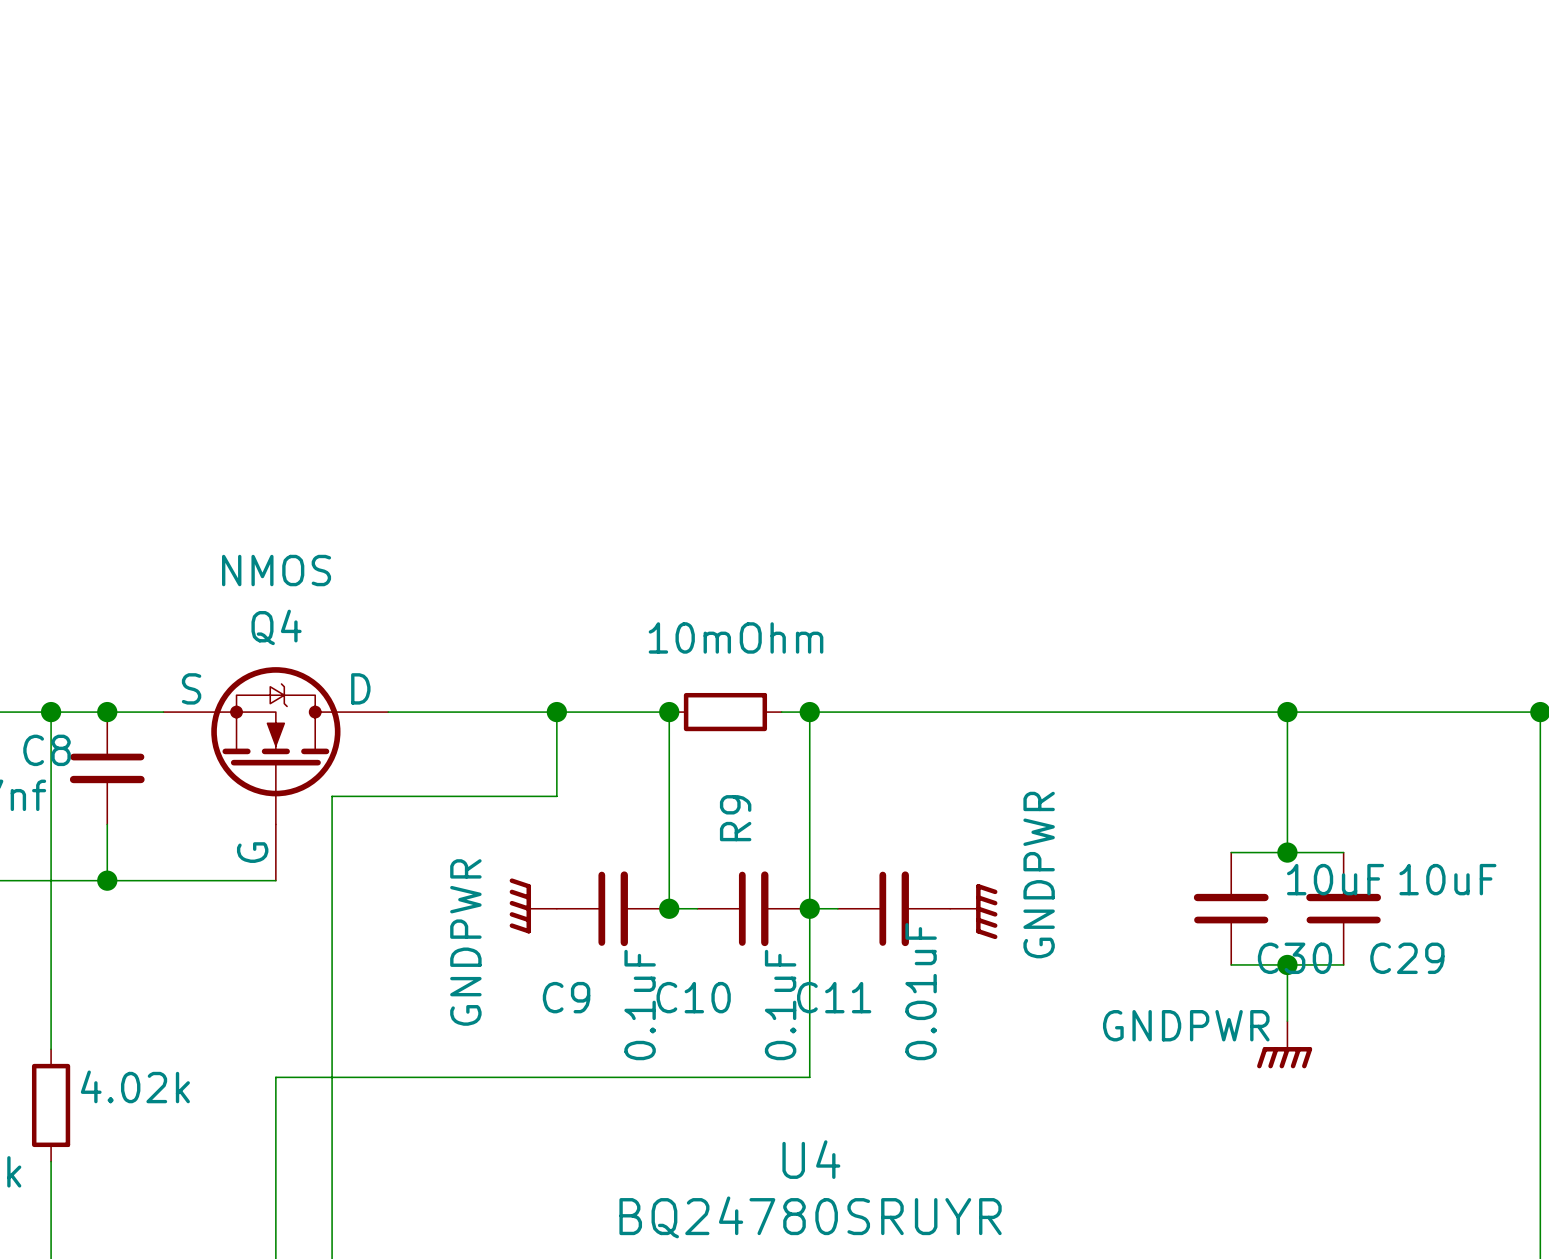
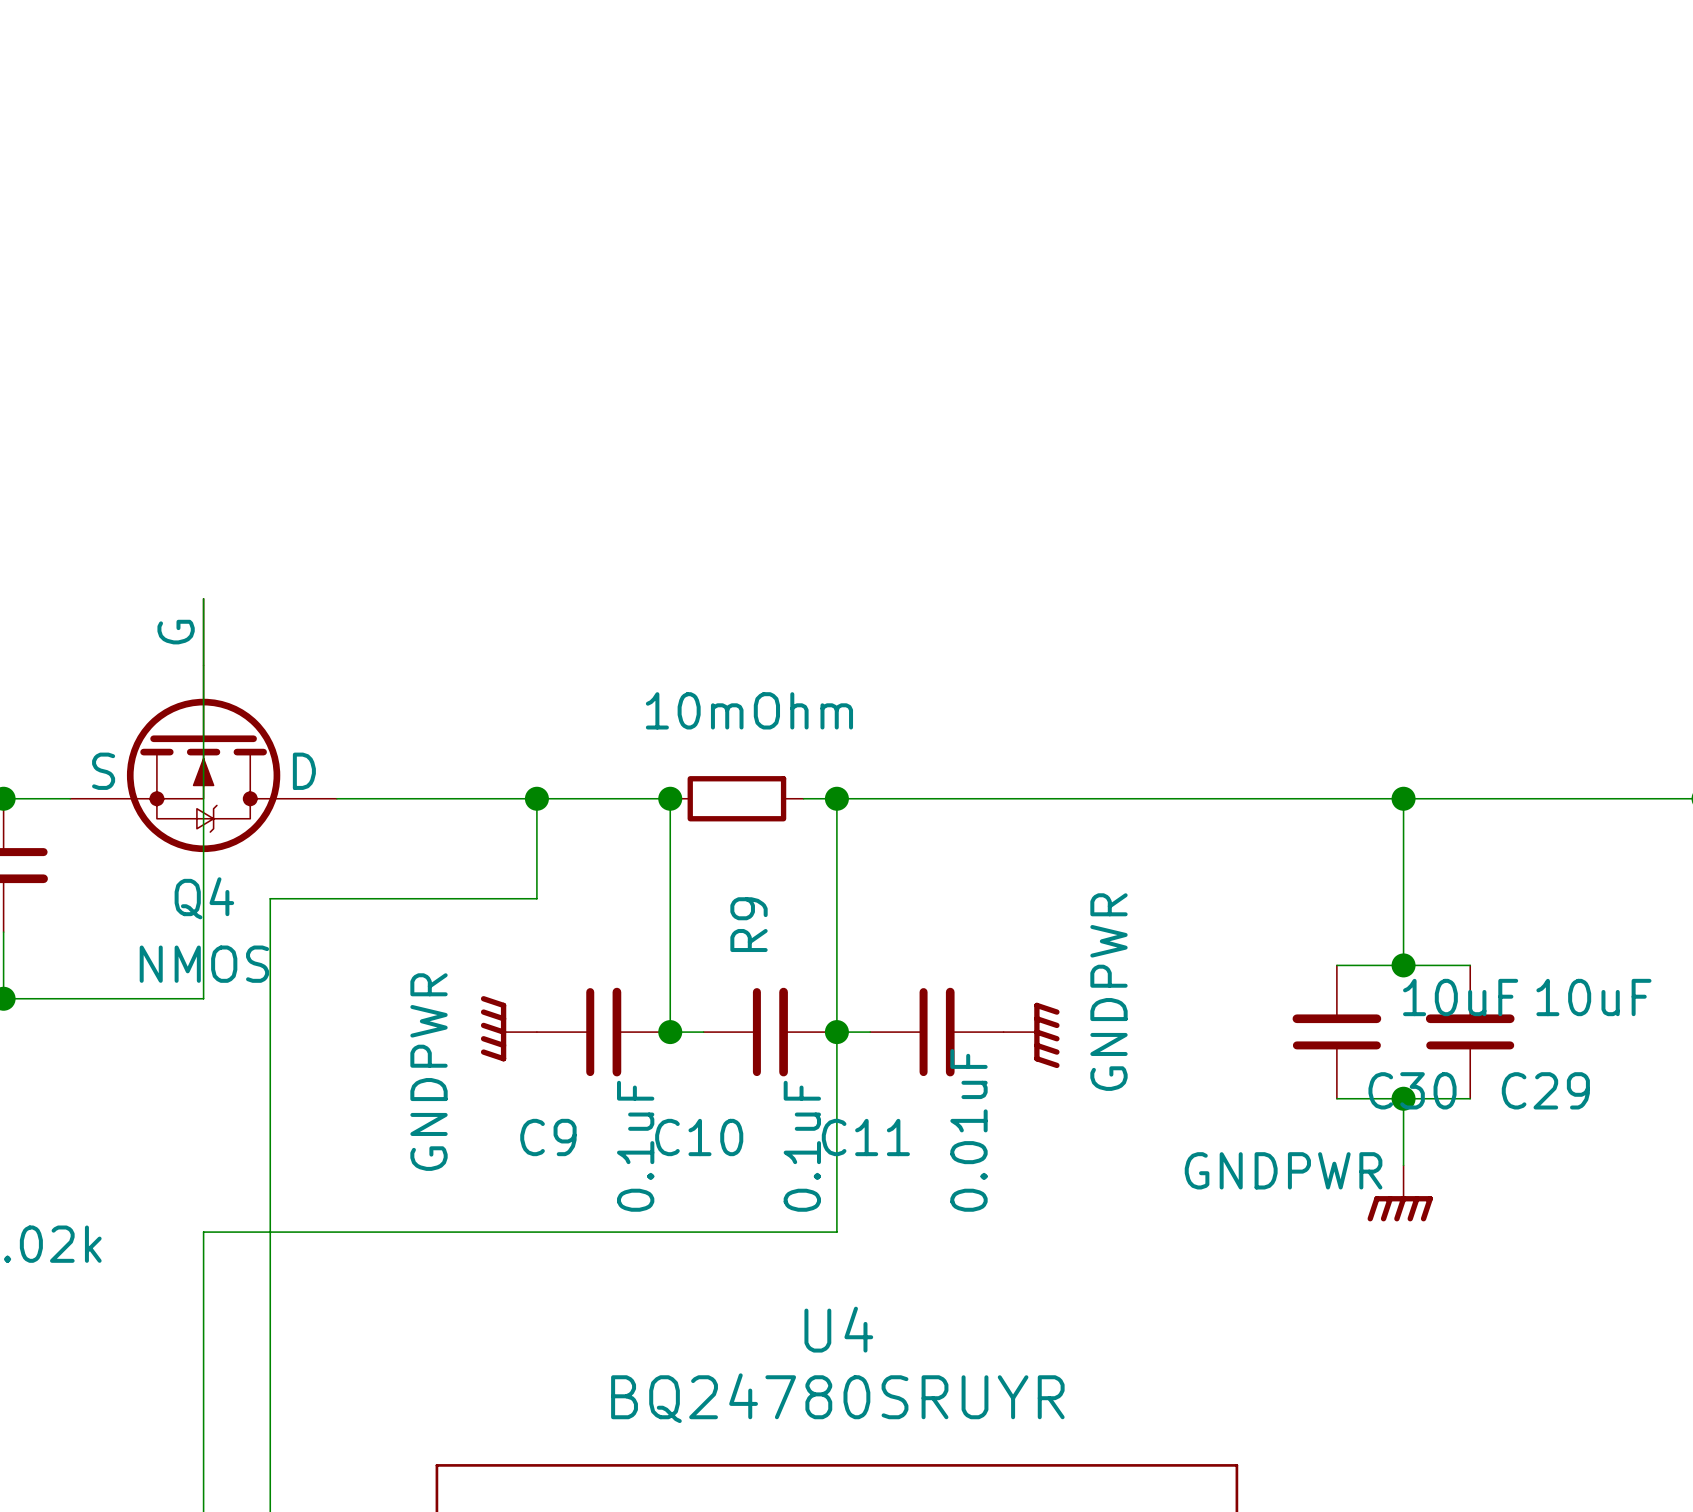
Q4 flip: as is (275, 745) -> up-down (203, 758)

